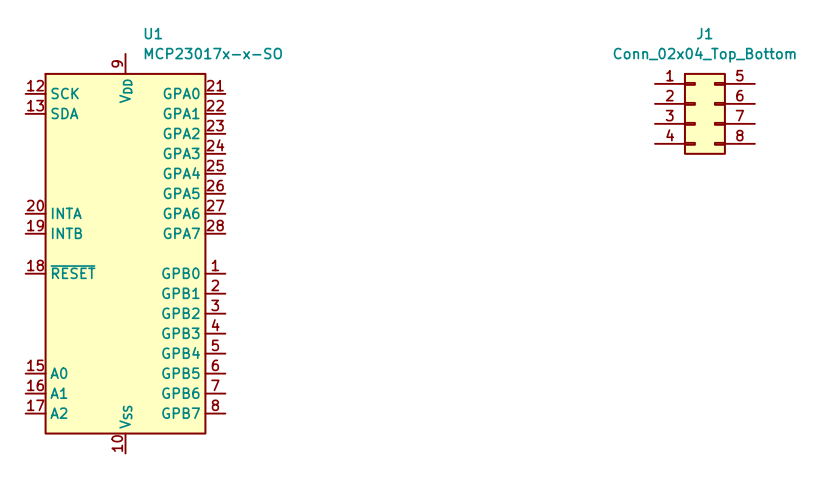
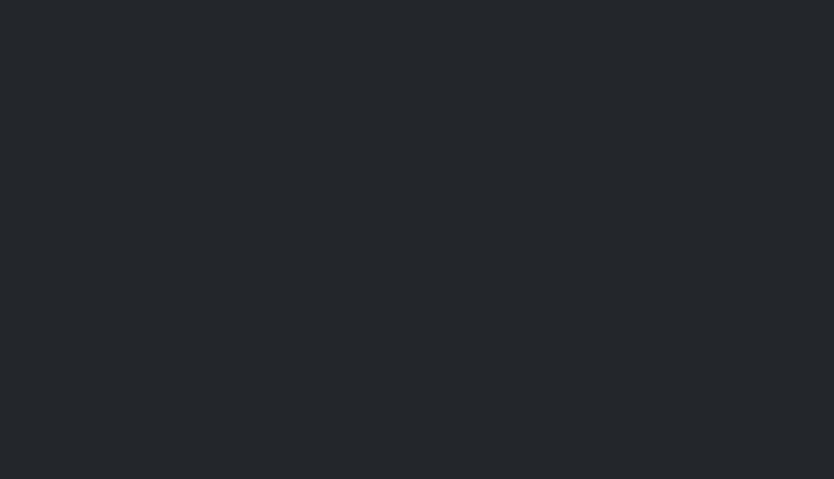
J1: Conn_02x04_Top_Bottom (704, 113) -> none
U1: MCP23017x-x-SO (125, 253) -> none

